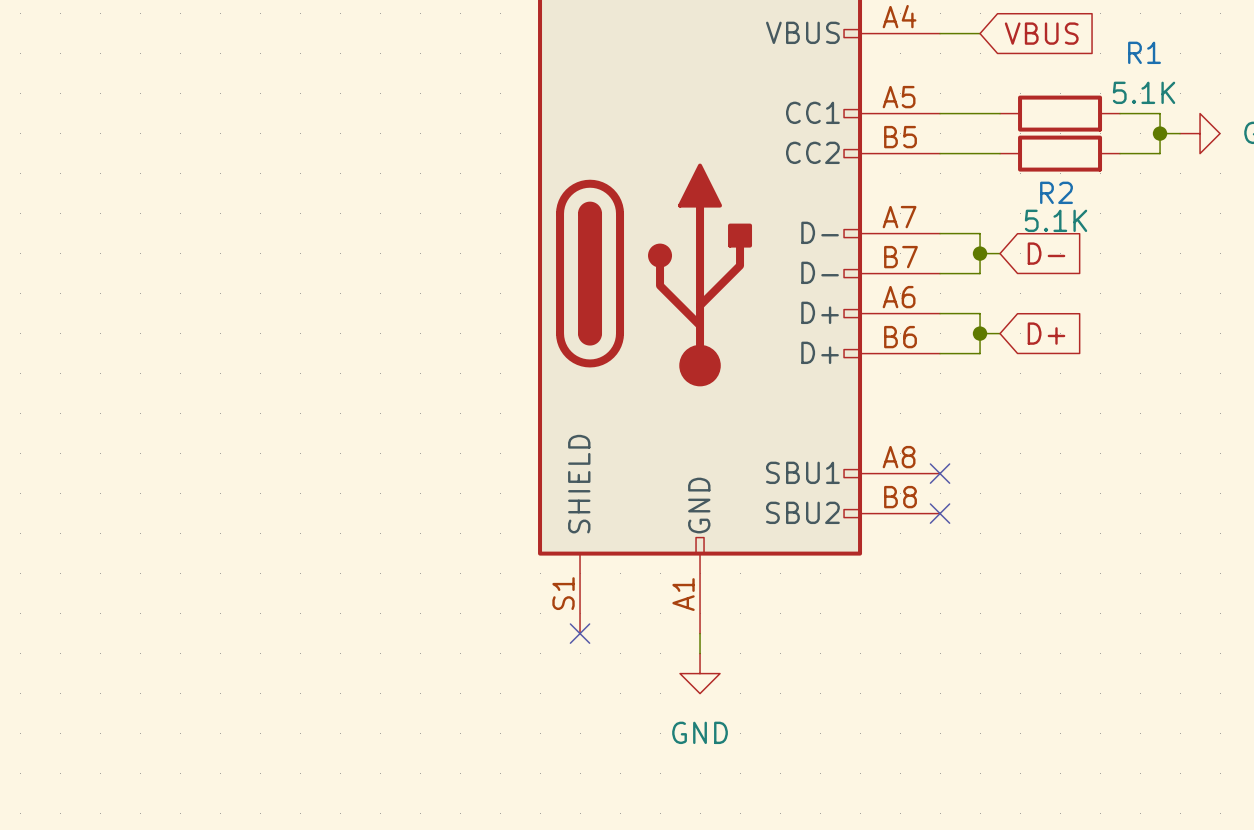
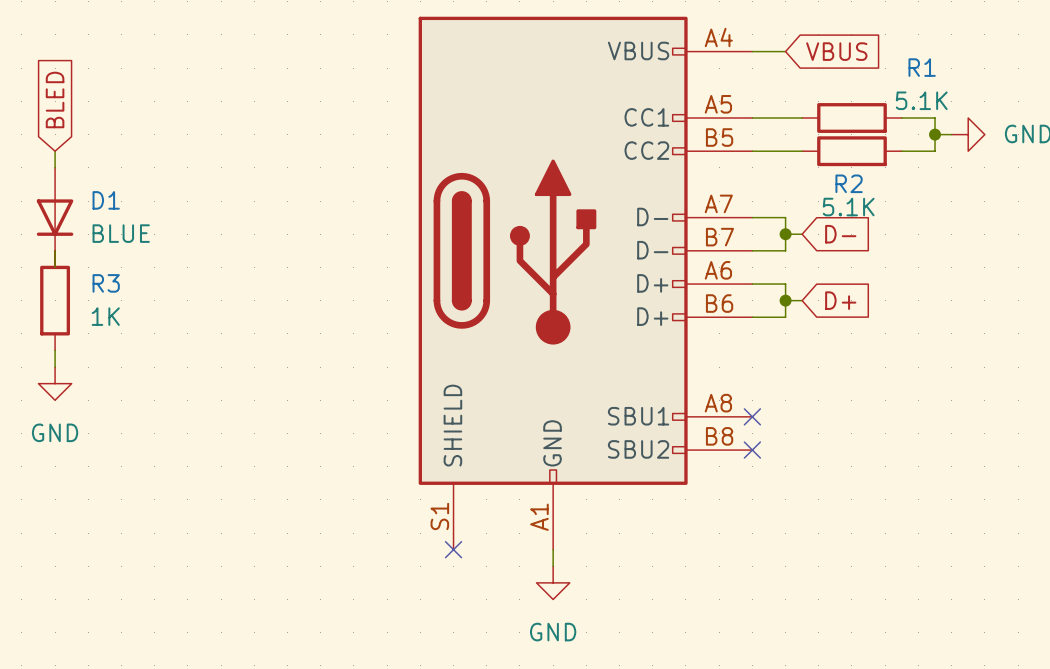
global label: none -> BLED (55, 99)
wire: none -> (55, 151) (55, 167)
D1: none -> BLUE (55, 217)
wire: none -> (55, 250) (55, 267)
R3: none -> 1K (55, 300)
wire: none -> (55, 350) (55, 367)
power symbol: none -> GND (55, 383)

